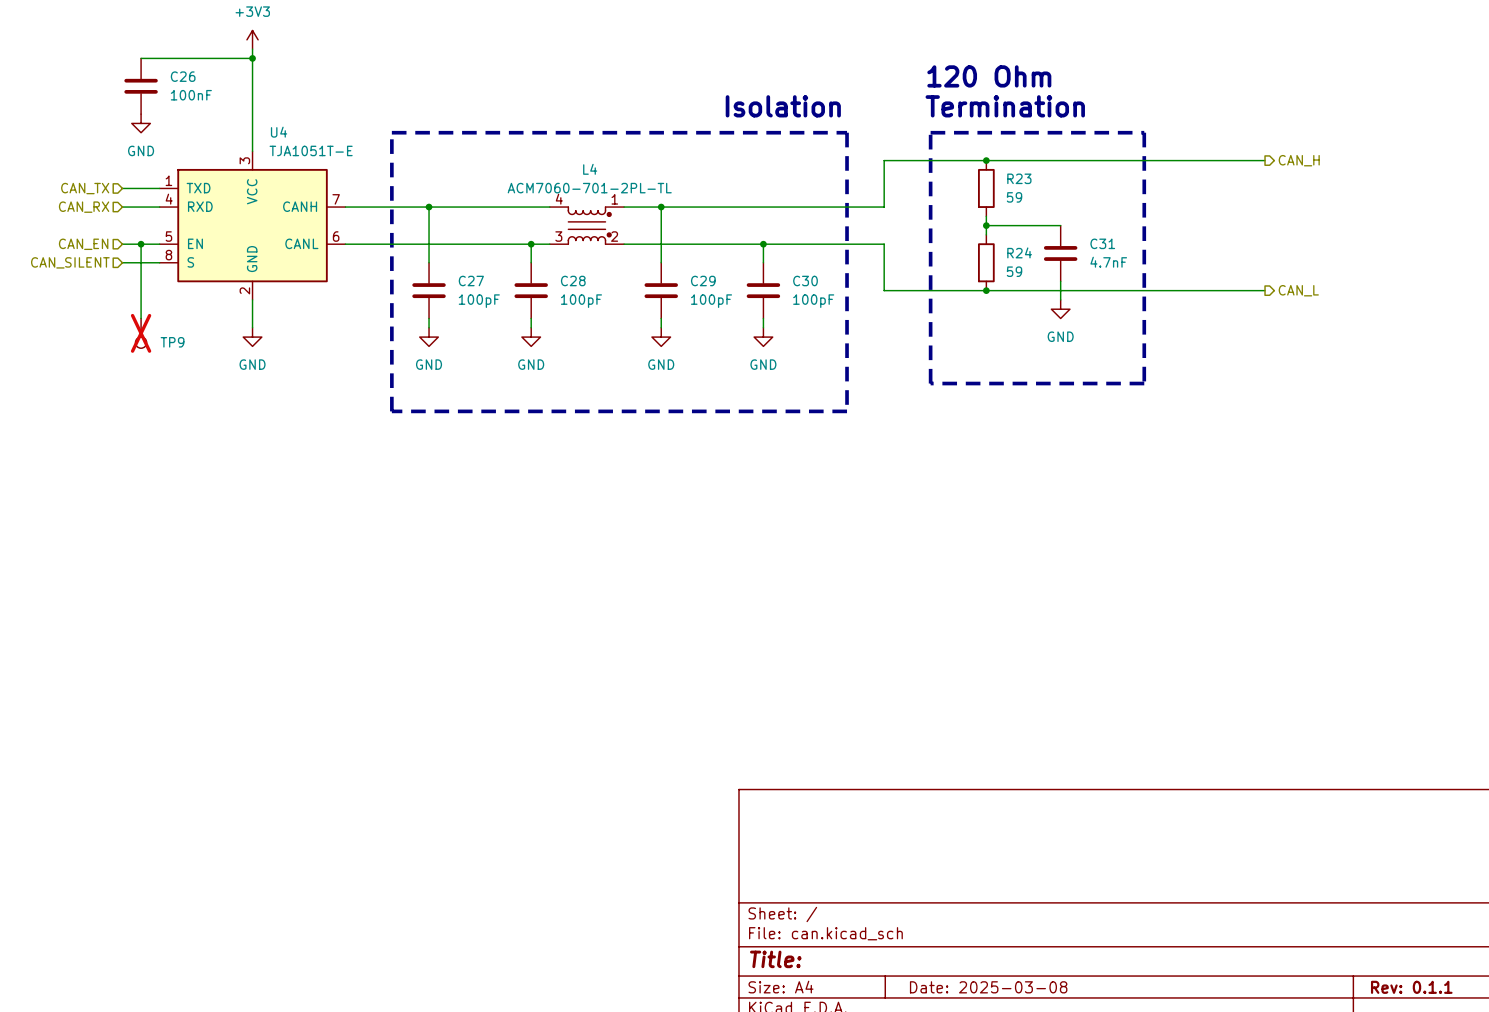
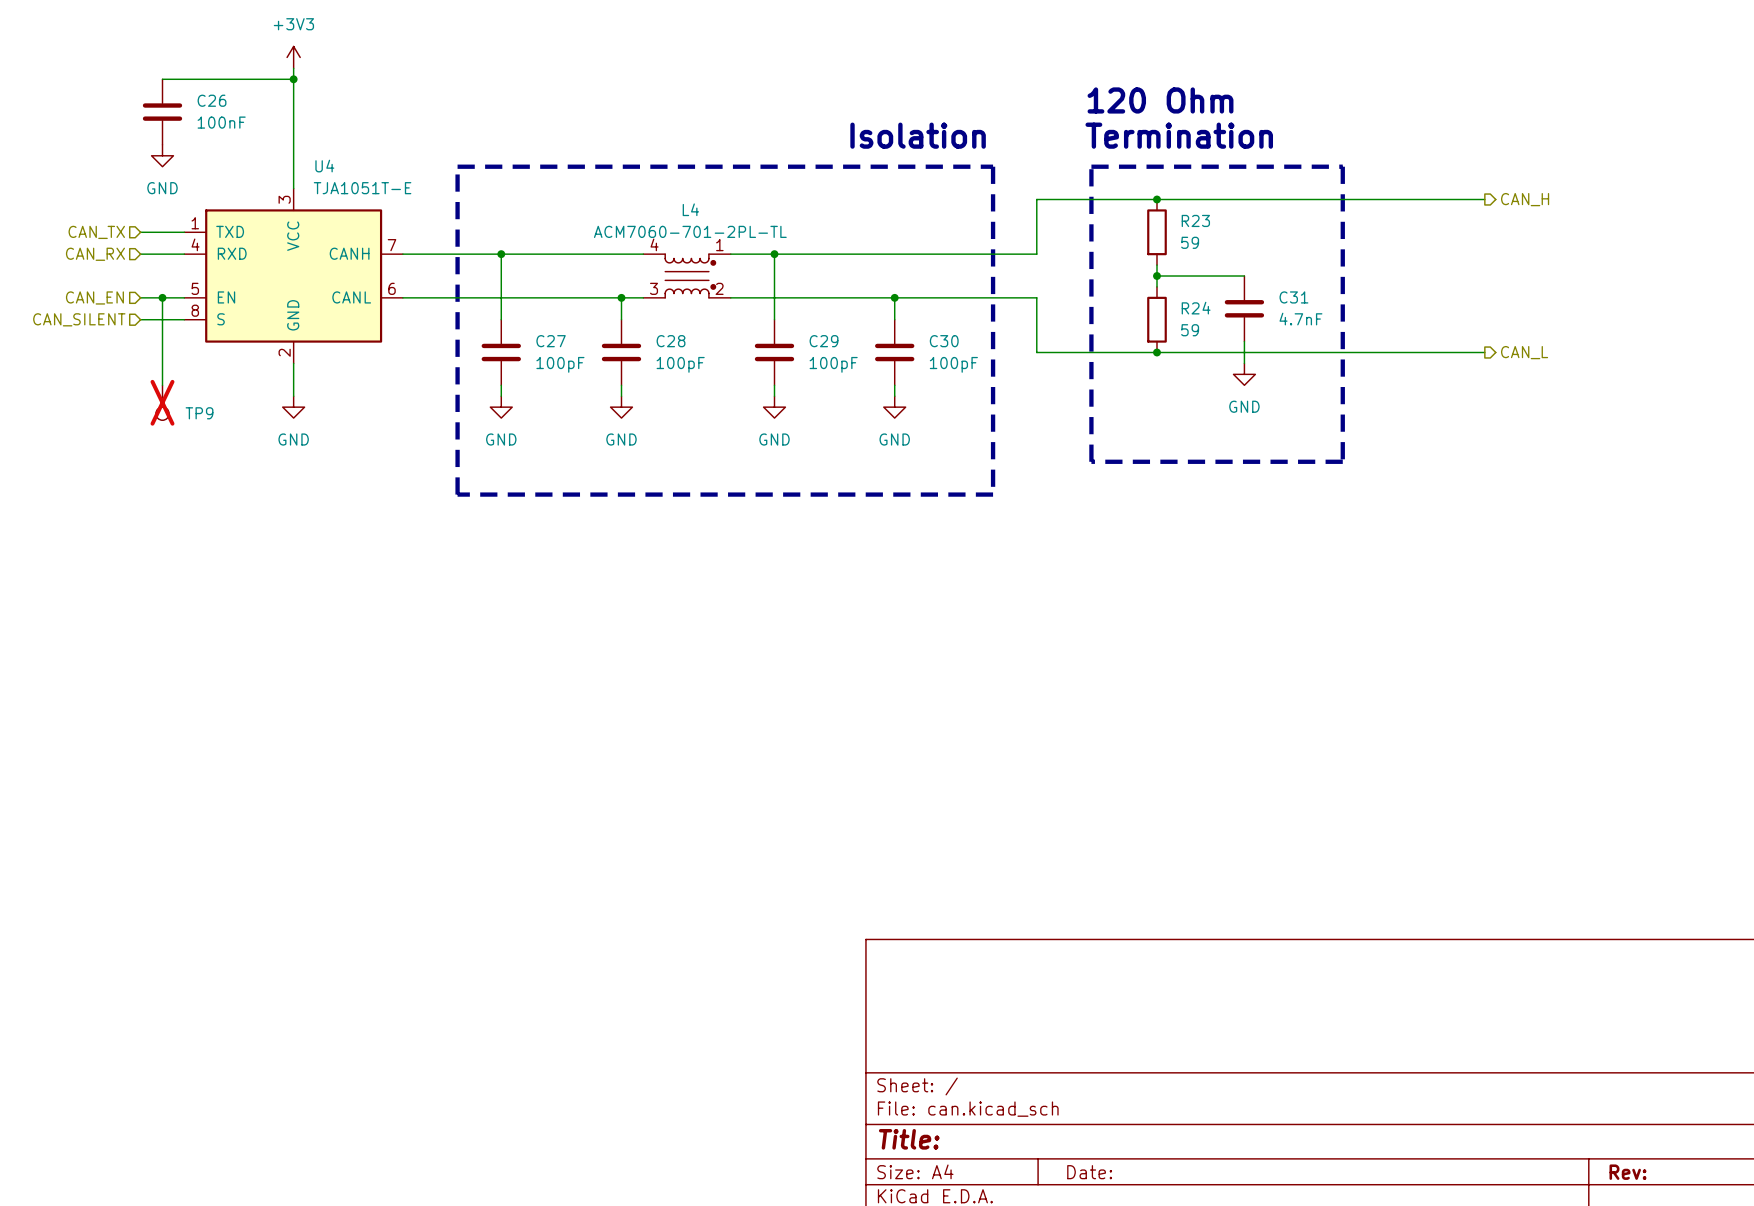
title block: Date: 2025-03-08 (988, 987) -> Date: (1089, 1172)
title block: Rev: 0.1.1 (1411, 987) -> Rev: (1627, 1172)

